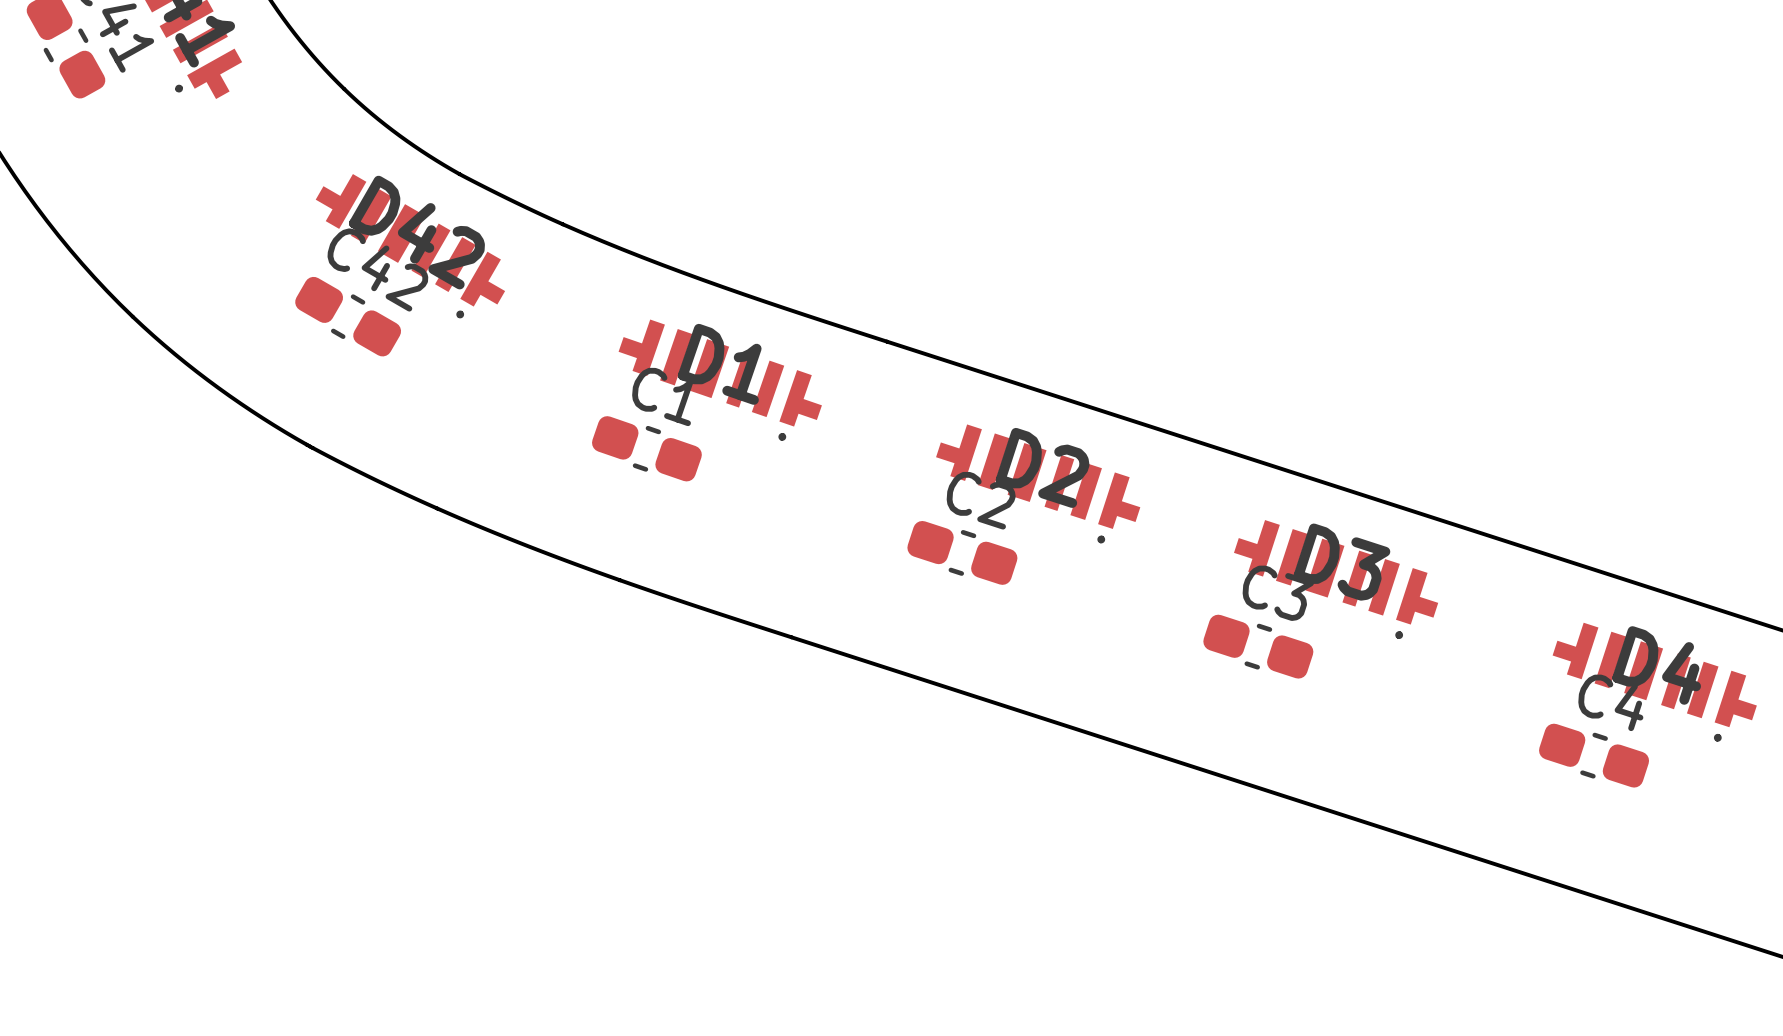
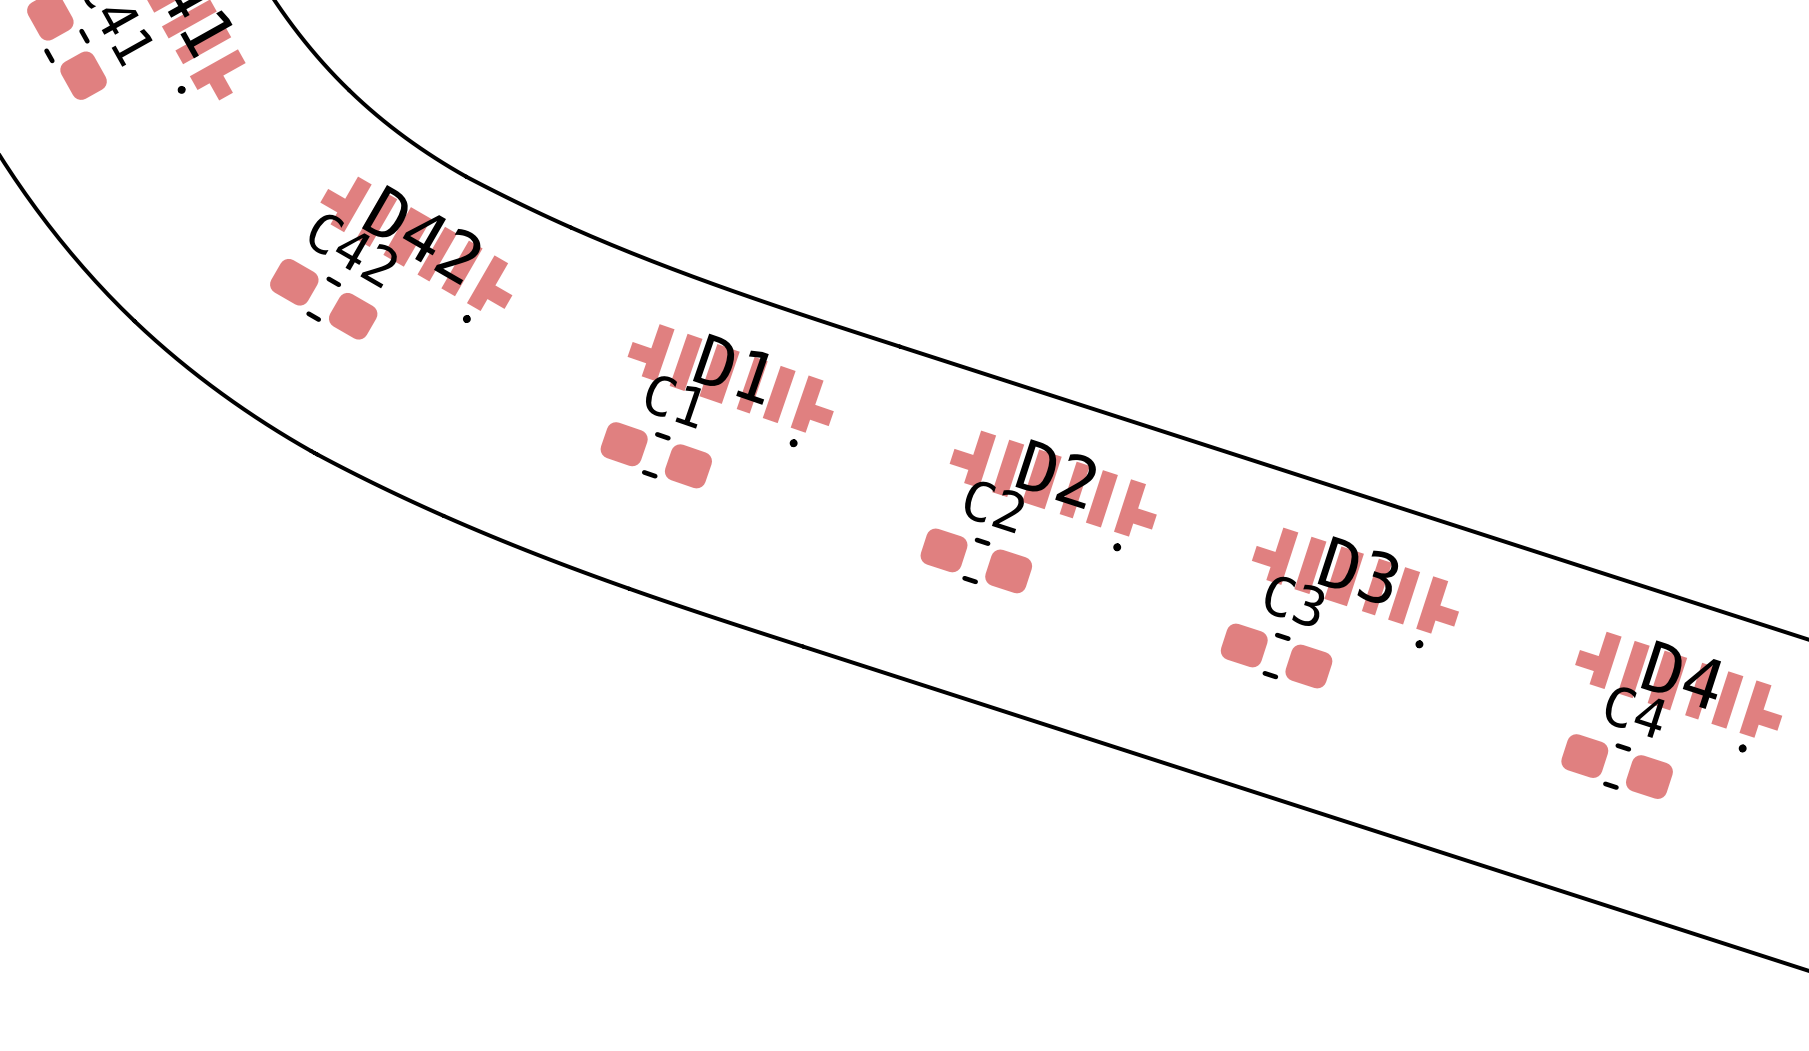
C42 position: (348, 316) -> (323, 299)

